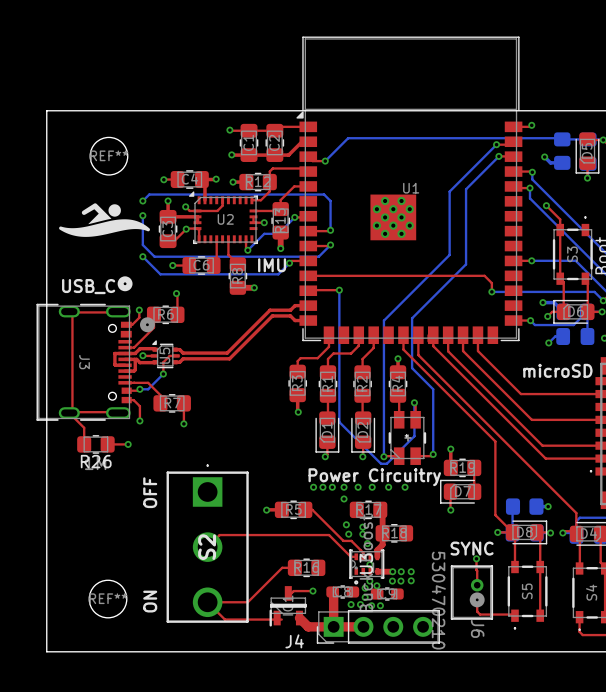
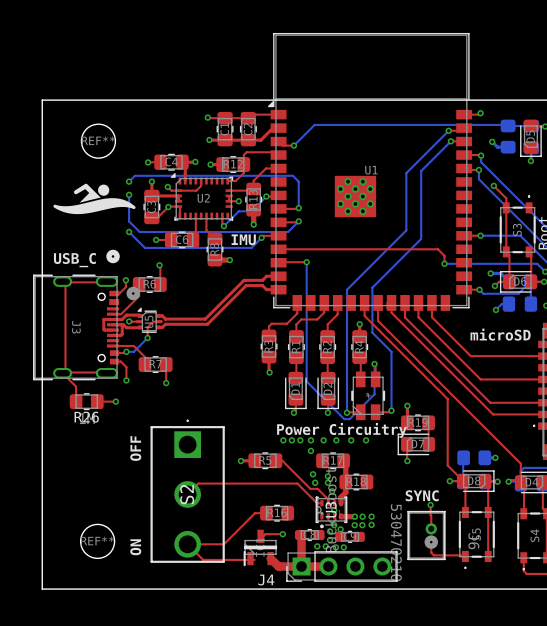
J6 name position: J6 (477, 628) -> J6 (473, 541)

